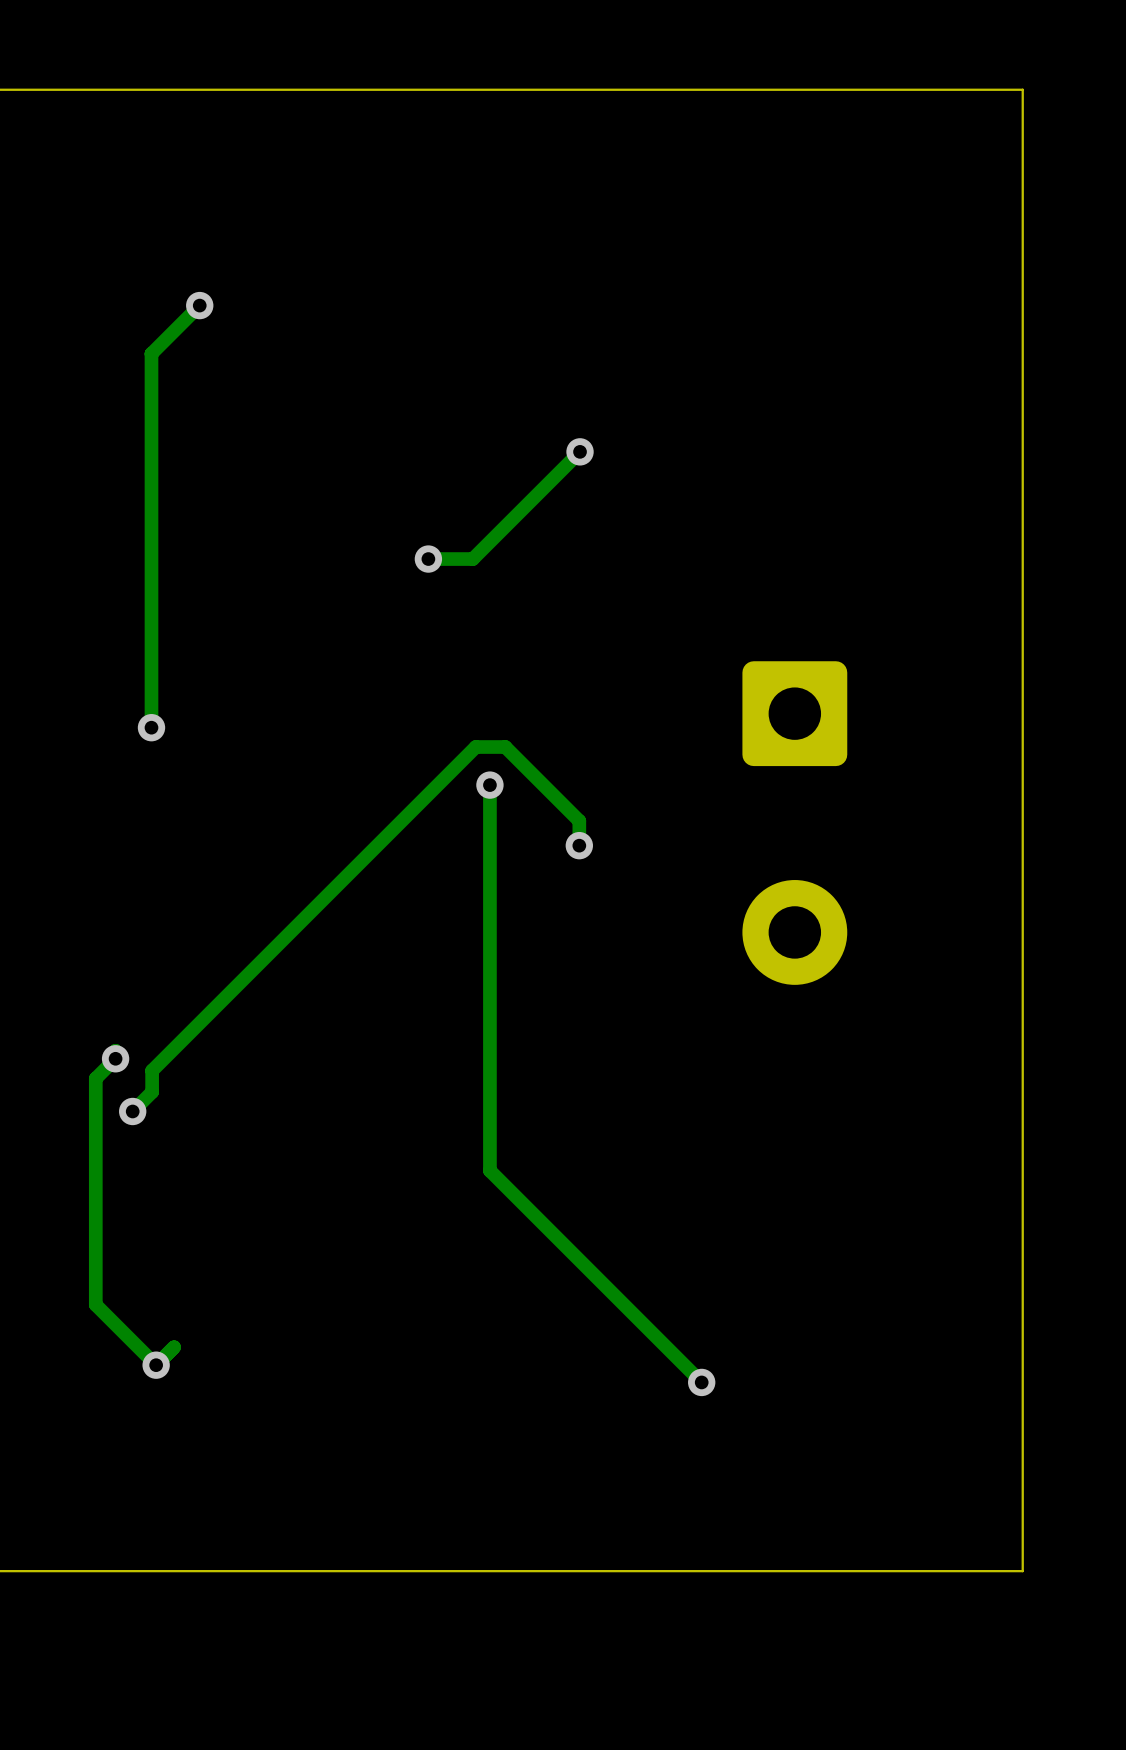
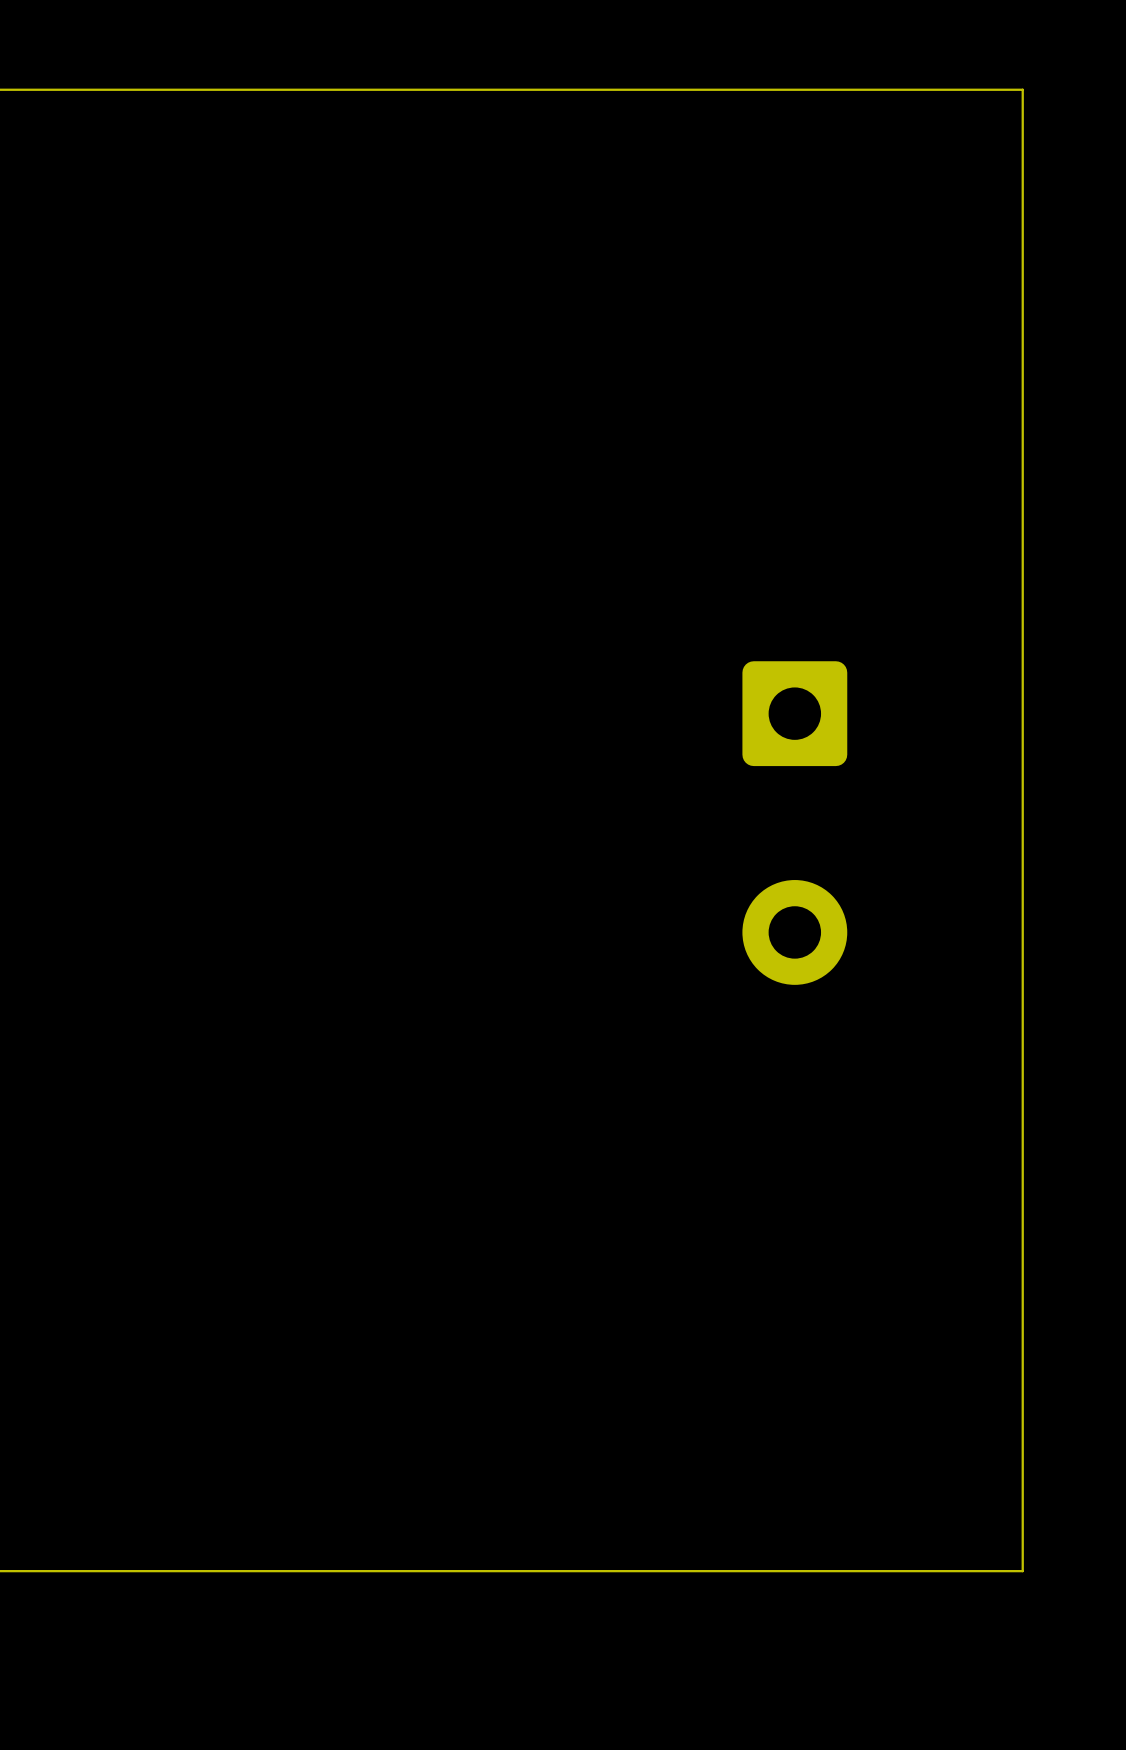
track: (199, 305) (151, 353) (151, 727) -> none
via: (199, 305) -> none
track: (580, 451) (472, 559) (428, 559) -> none
via: (580, 451) -> none
via: (428, 559) -> none
via: (151, 727) -> none
track: (489, 785) (489, 1170) (701, 1382) -> none
via: (489, 785) -> none
track: (579, 845) (579, 821) (505, 747) (475, 747) (152, 1070) (152, 1092) (132, 1111) -> none
via: (579, 845) -> none
track: (115, 1050) (115, 1058) (95, 1078) (95, 1304) (156, 1365) (174, 1347) -> none
via: (115, 1058) -> none
via: (132, 1111) -> none
via: (156, 1365) -> none
via: (701, 1382) -> none

